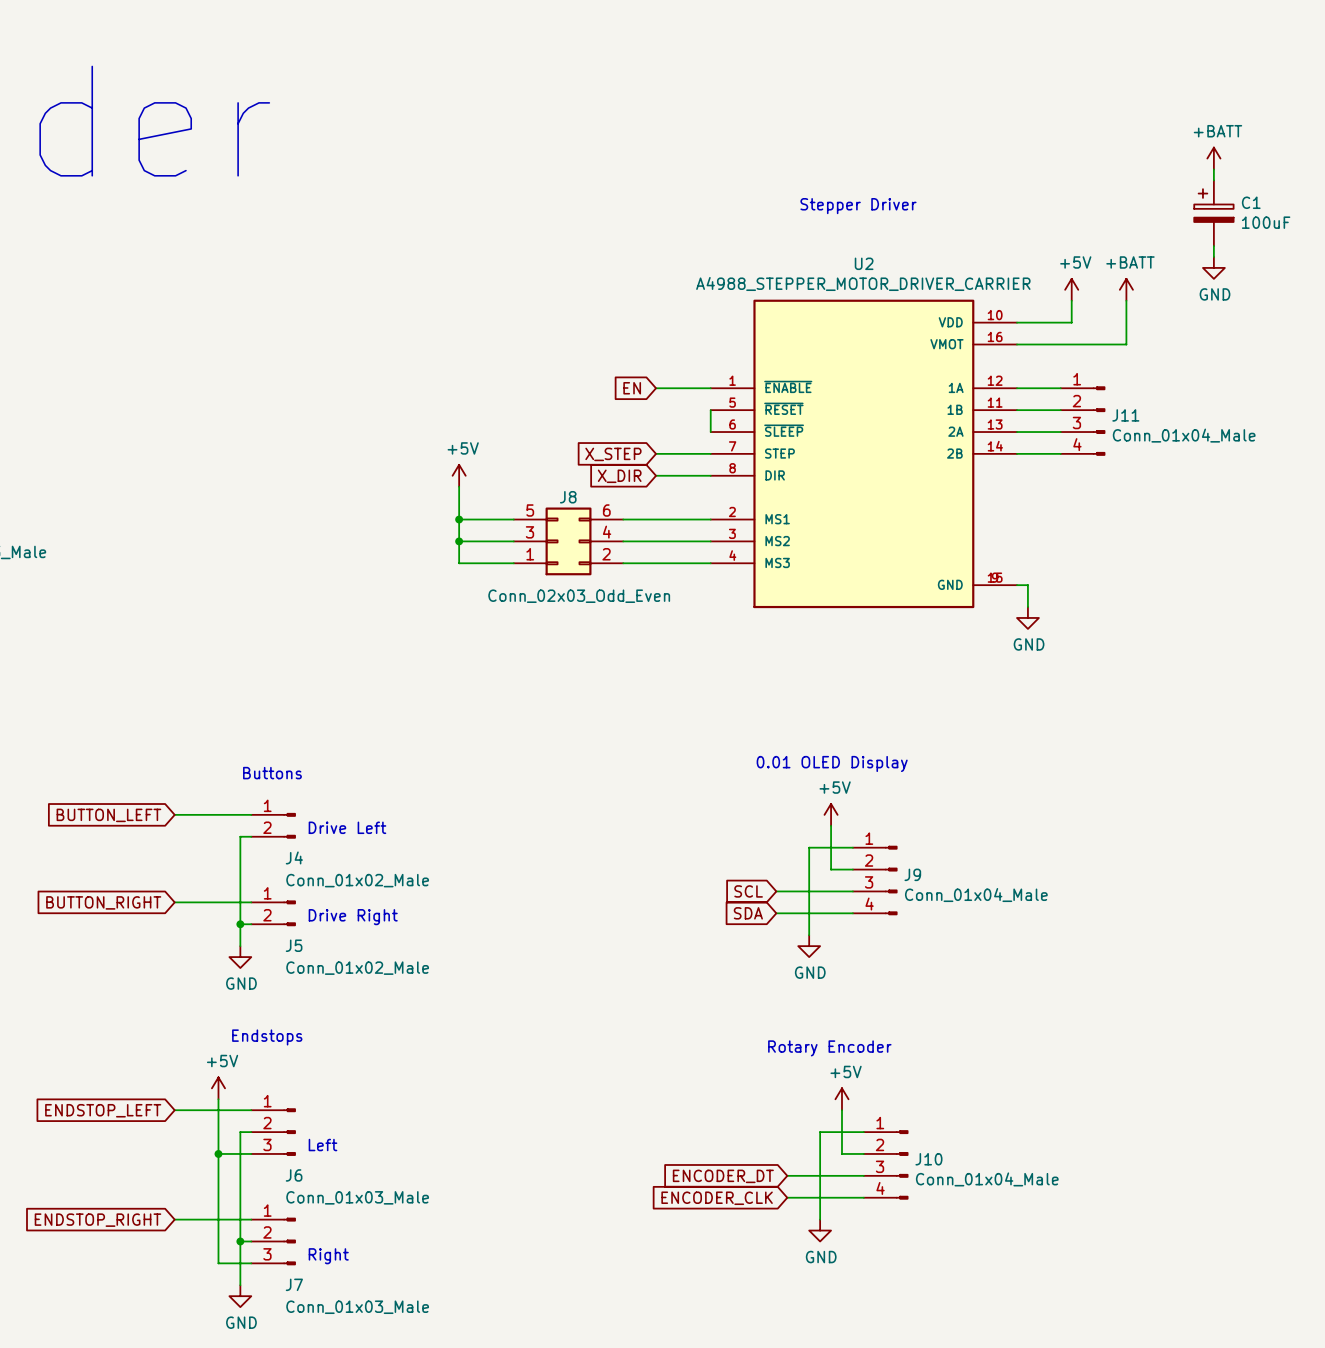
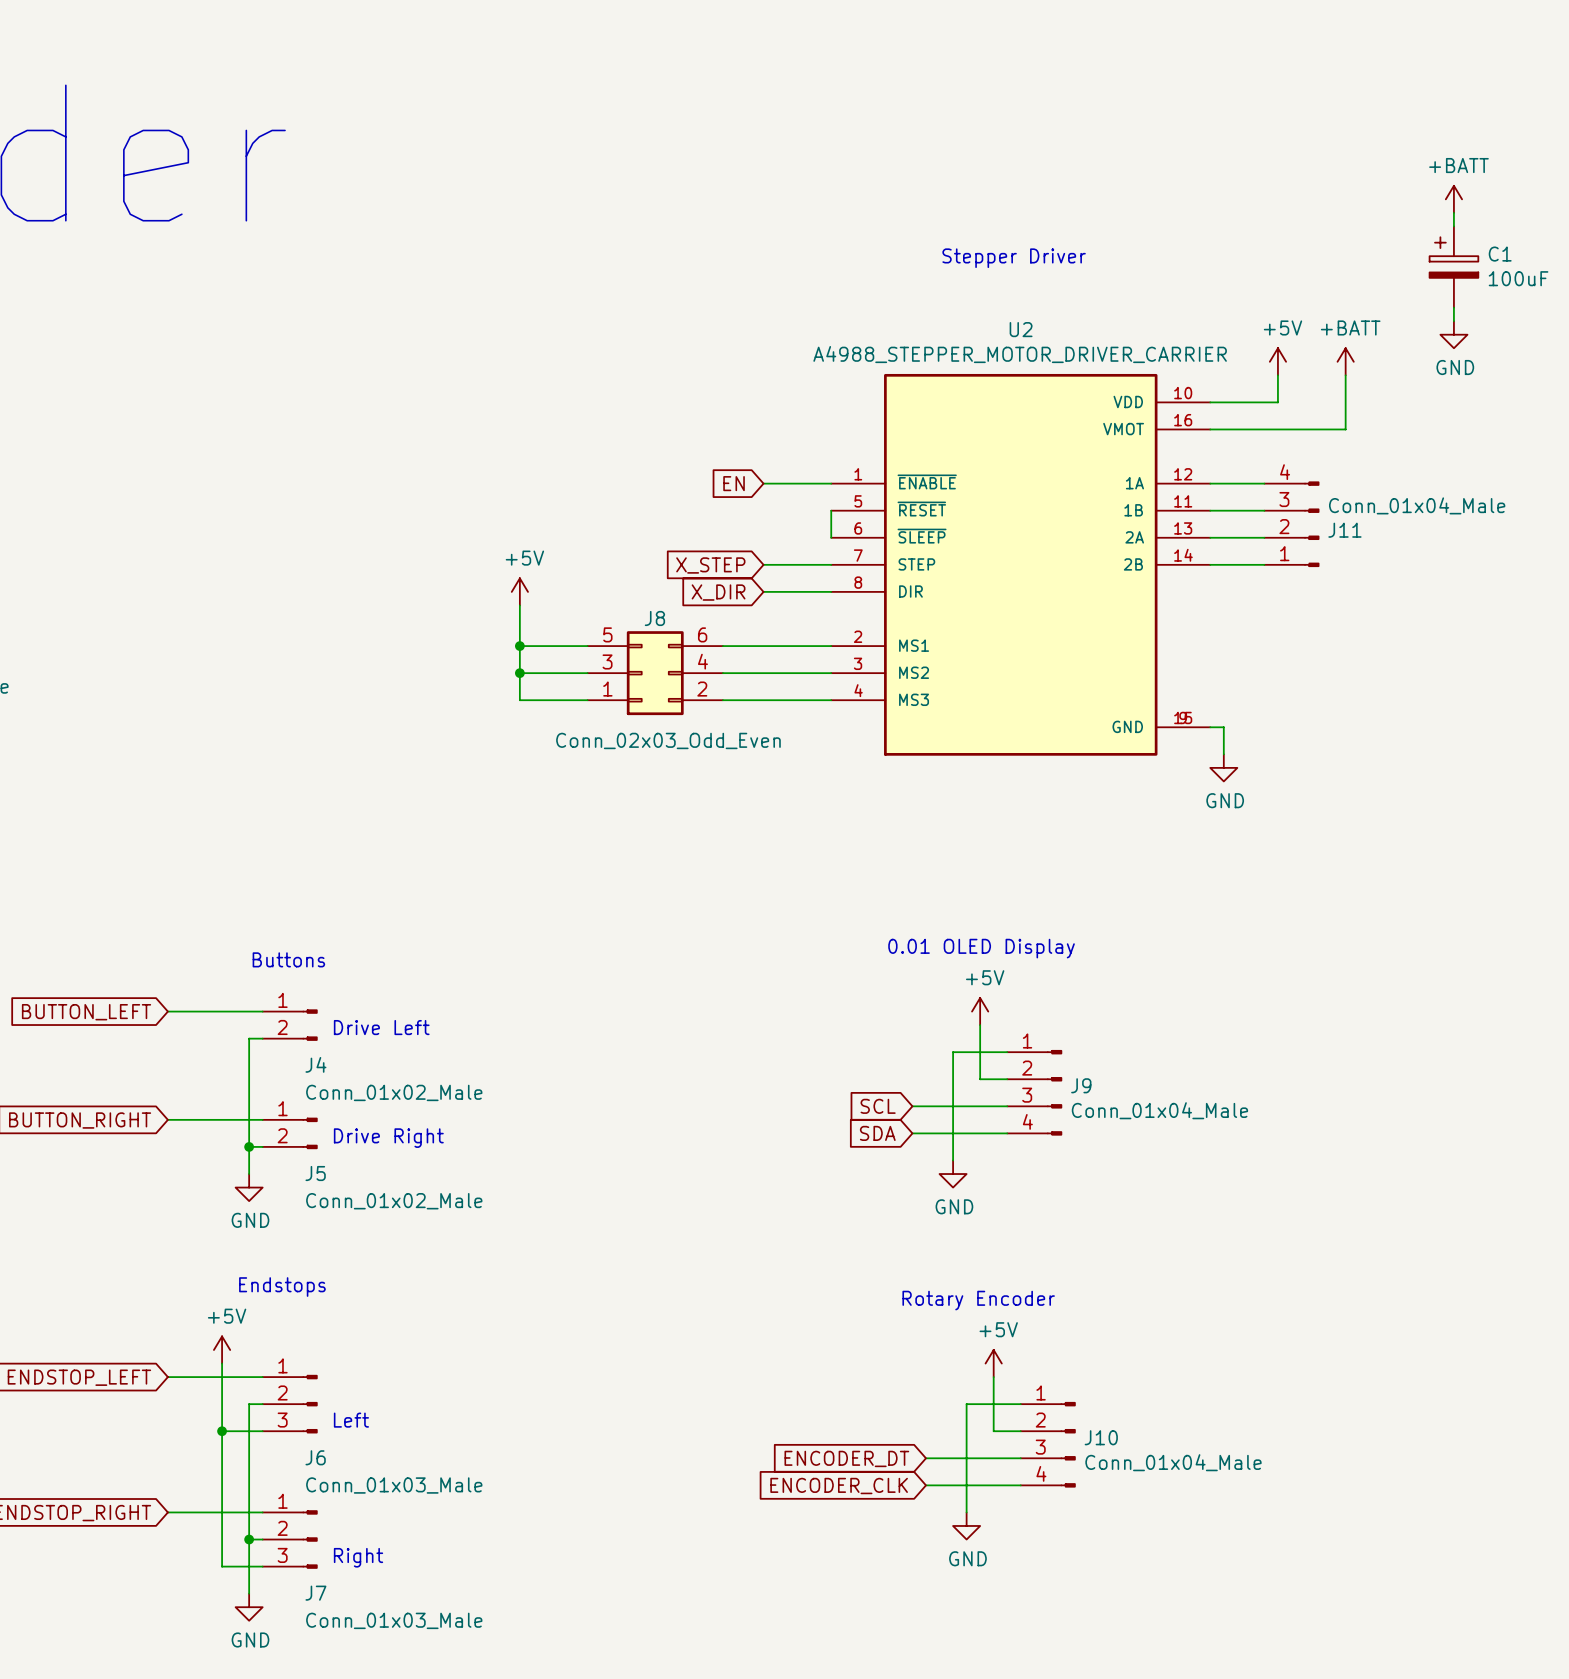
J11 flip: as is (1099, 421) -> up-down (1311, 524)

